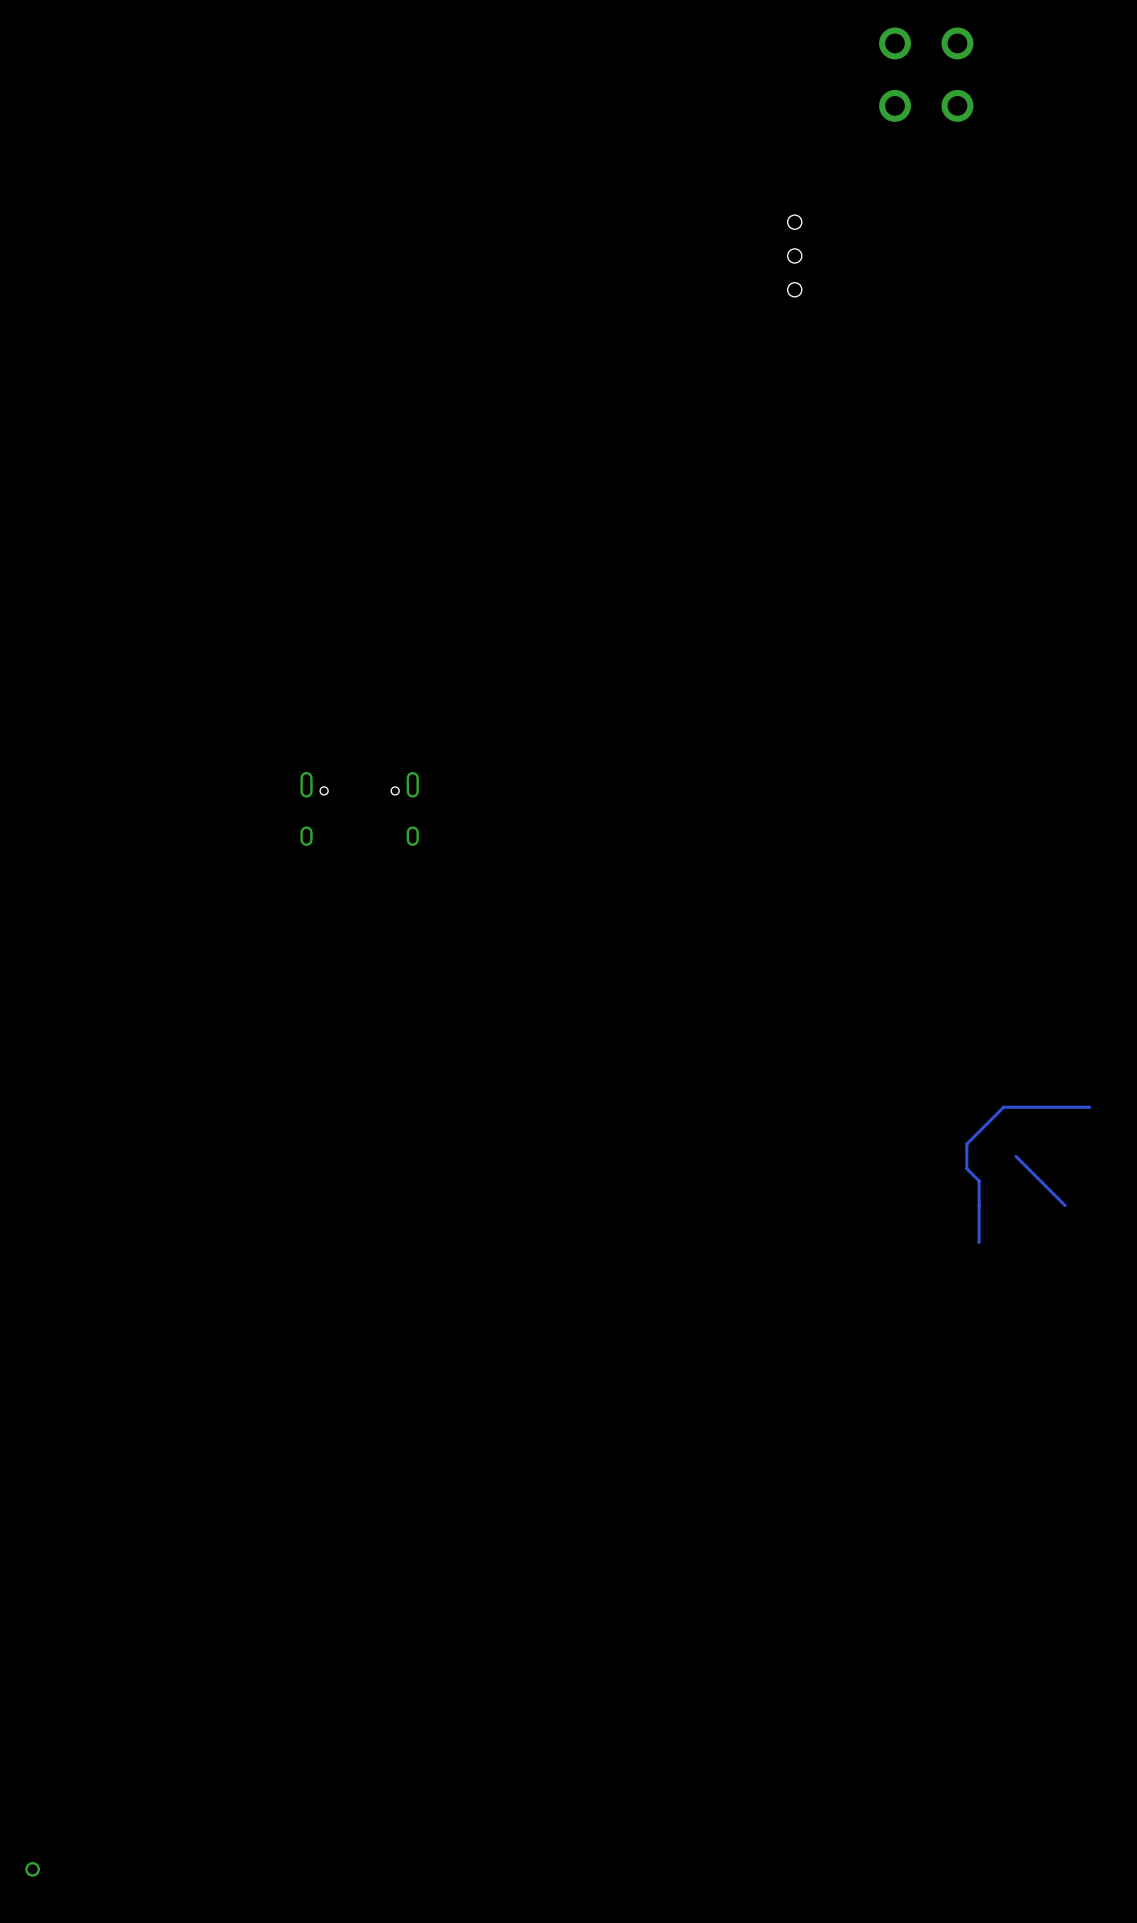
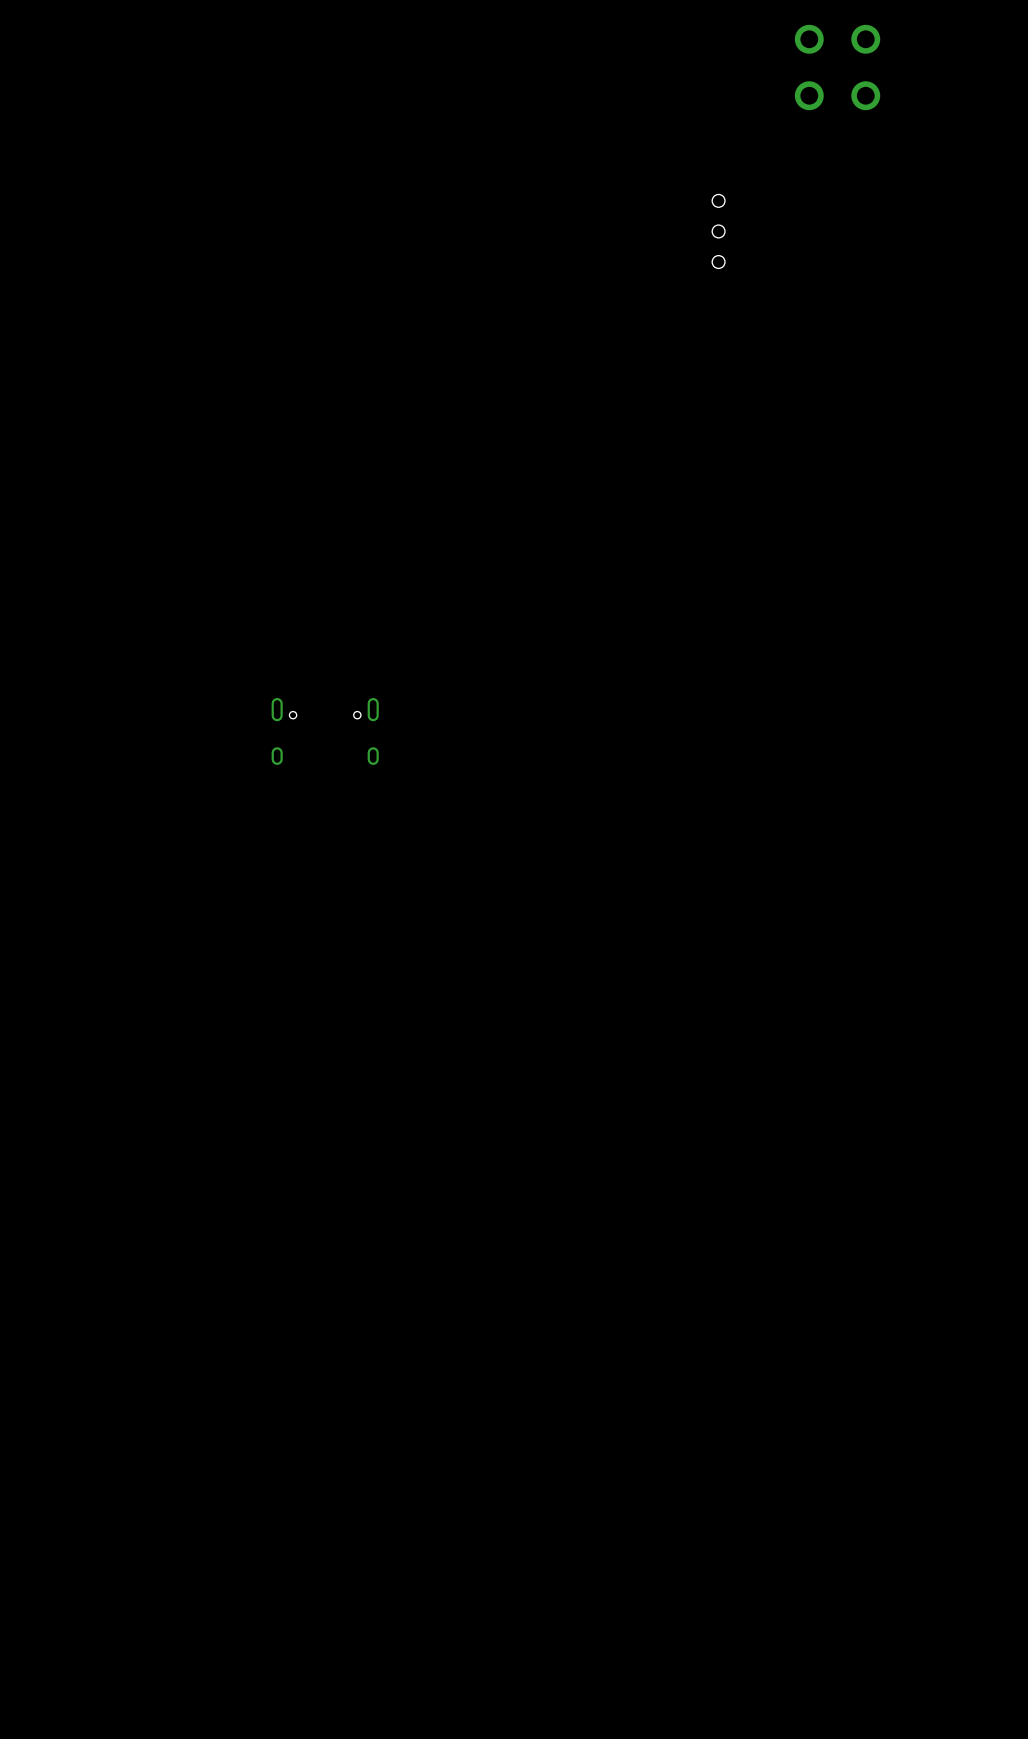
track: (1089, 1107) (1003, 1107) (966, 1144) (966, 1168) (979, 1180) (979, 1242) -> none
track: (1015, 1156) (1065, 1205) -> none
via: (32, 1869) -> none

